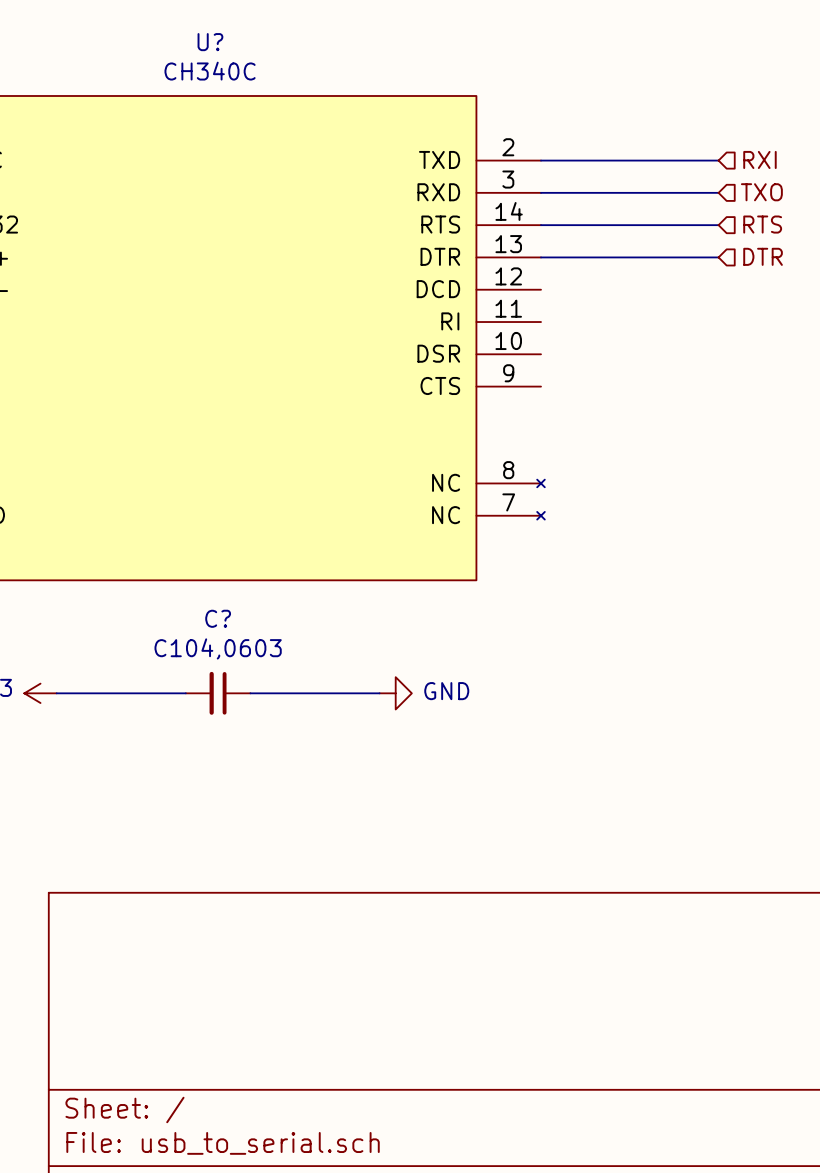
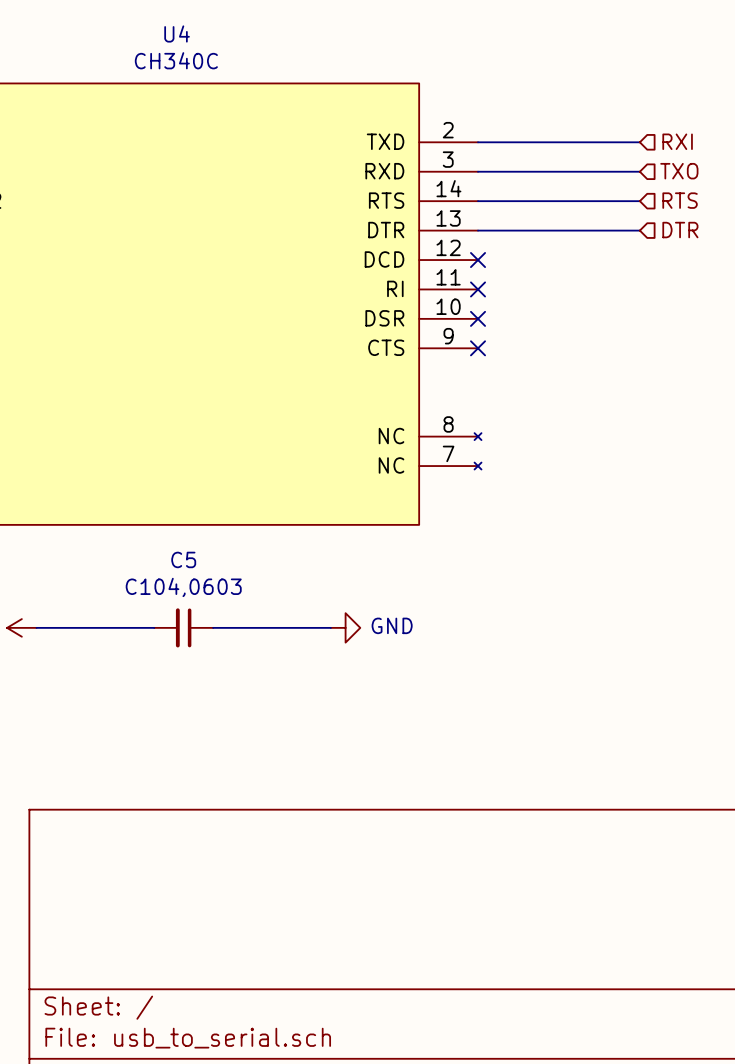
U? name: U? (210, 42) -> U4 (177, 33)
no-connect mark: none -> (478, 260)
no-connect mark: none -> (478, 289)
no-connect mark: none -> (478, 318)
no-connect mark: none -> (478, 348)
C? name: C? (218, 618) -> C5 (183, 559)

